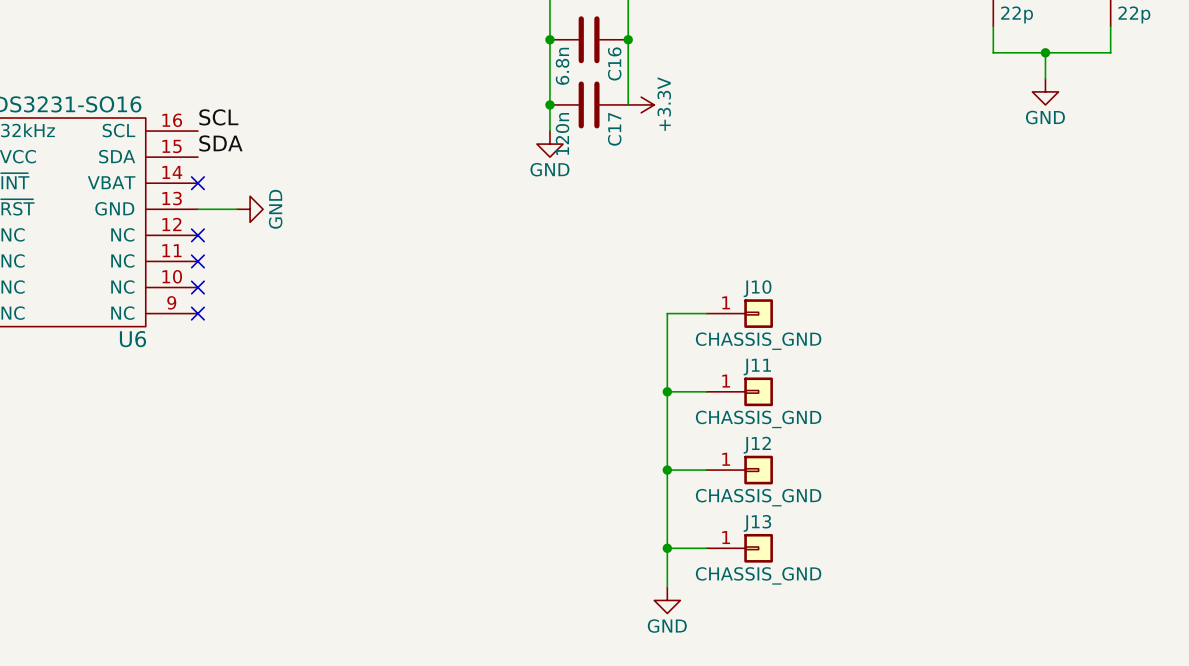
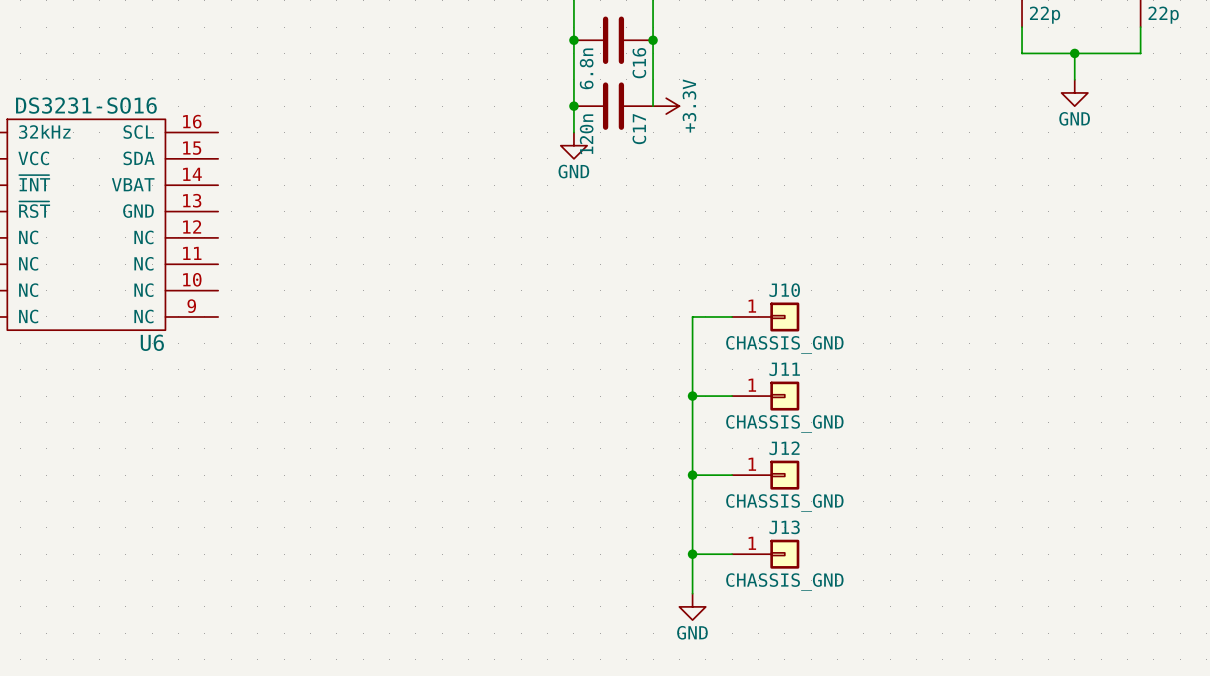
label: SCL (218, 117) -> none
label: SDA (220, 143) -> none
no-connect mark: (197, 183) -> none
wire: (197, 209) (237, 209) -> none
power symbol: GND (250, 209) -> none
no-connect mark: (197, 235) -> none
no-connect mark: (197, 261) -> none
no-connect mark: (197, 287) -> none
no-connect mark: (197, 313) -> none

